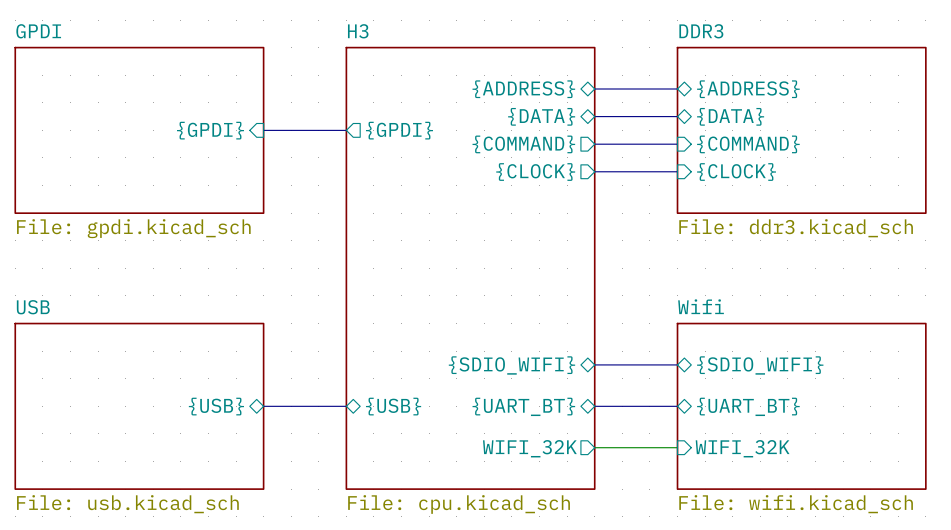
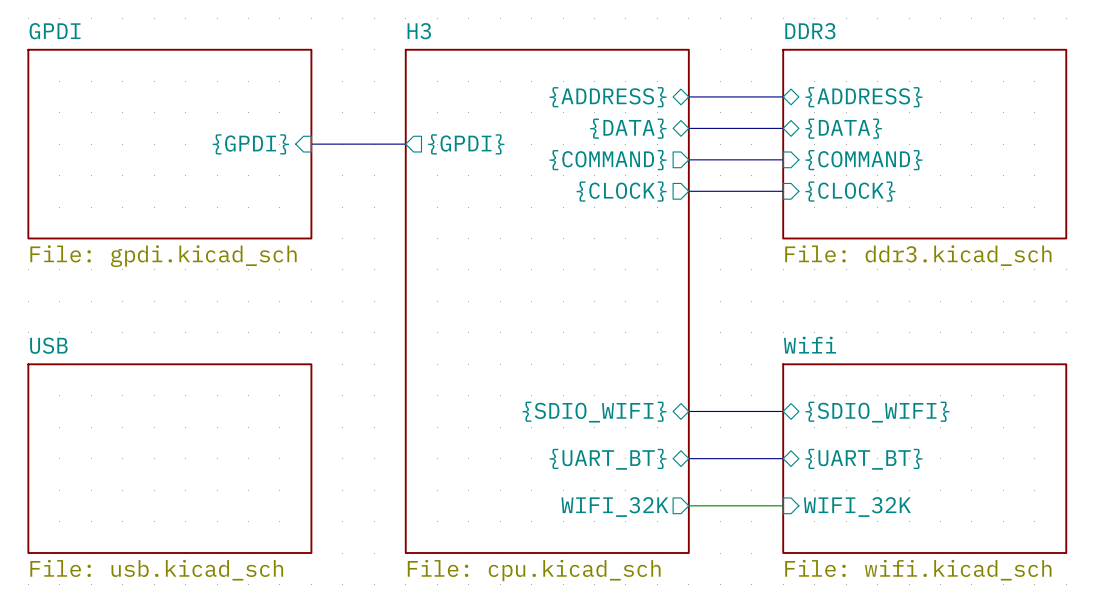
sheet pin: {USB} (216, 406) -> none
bus: (263, 406) (346, 406) -> none
sheet pin: {USB} (393, 406) -> none

